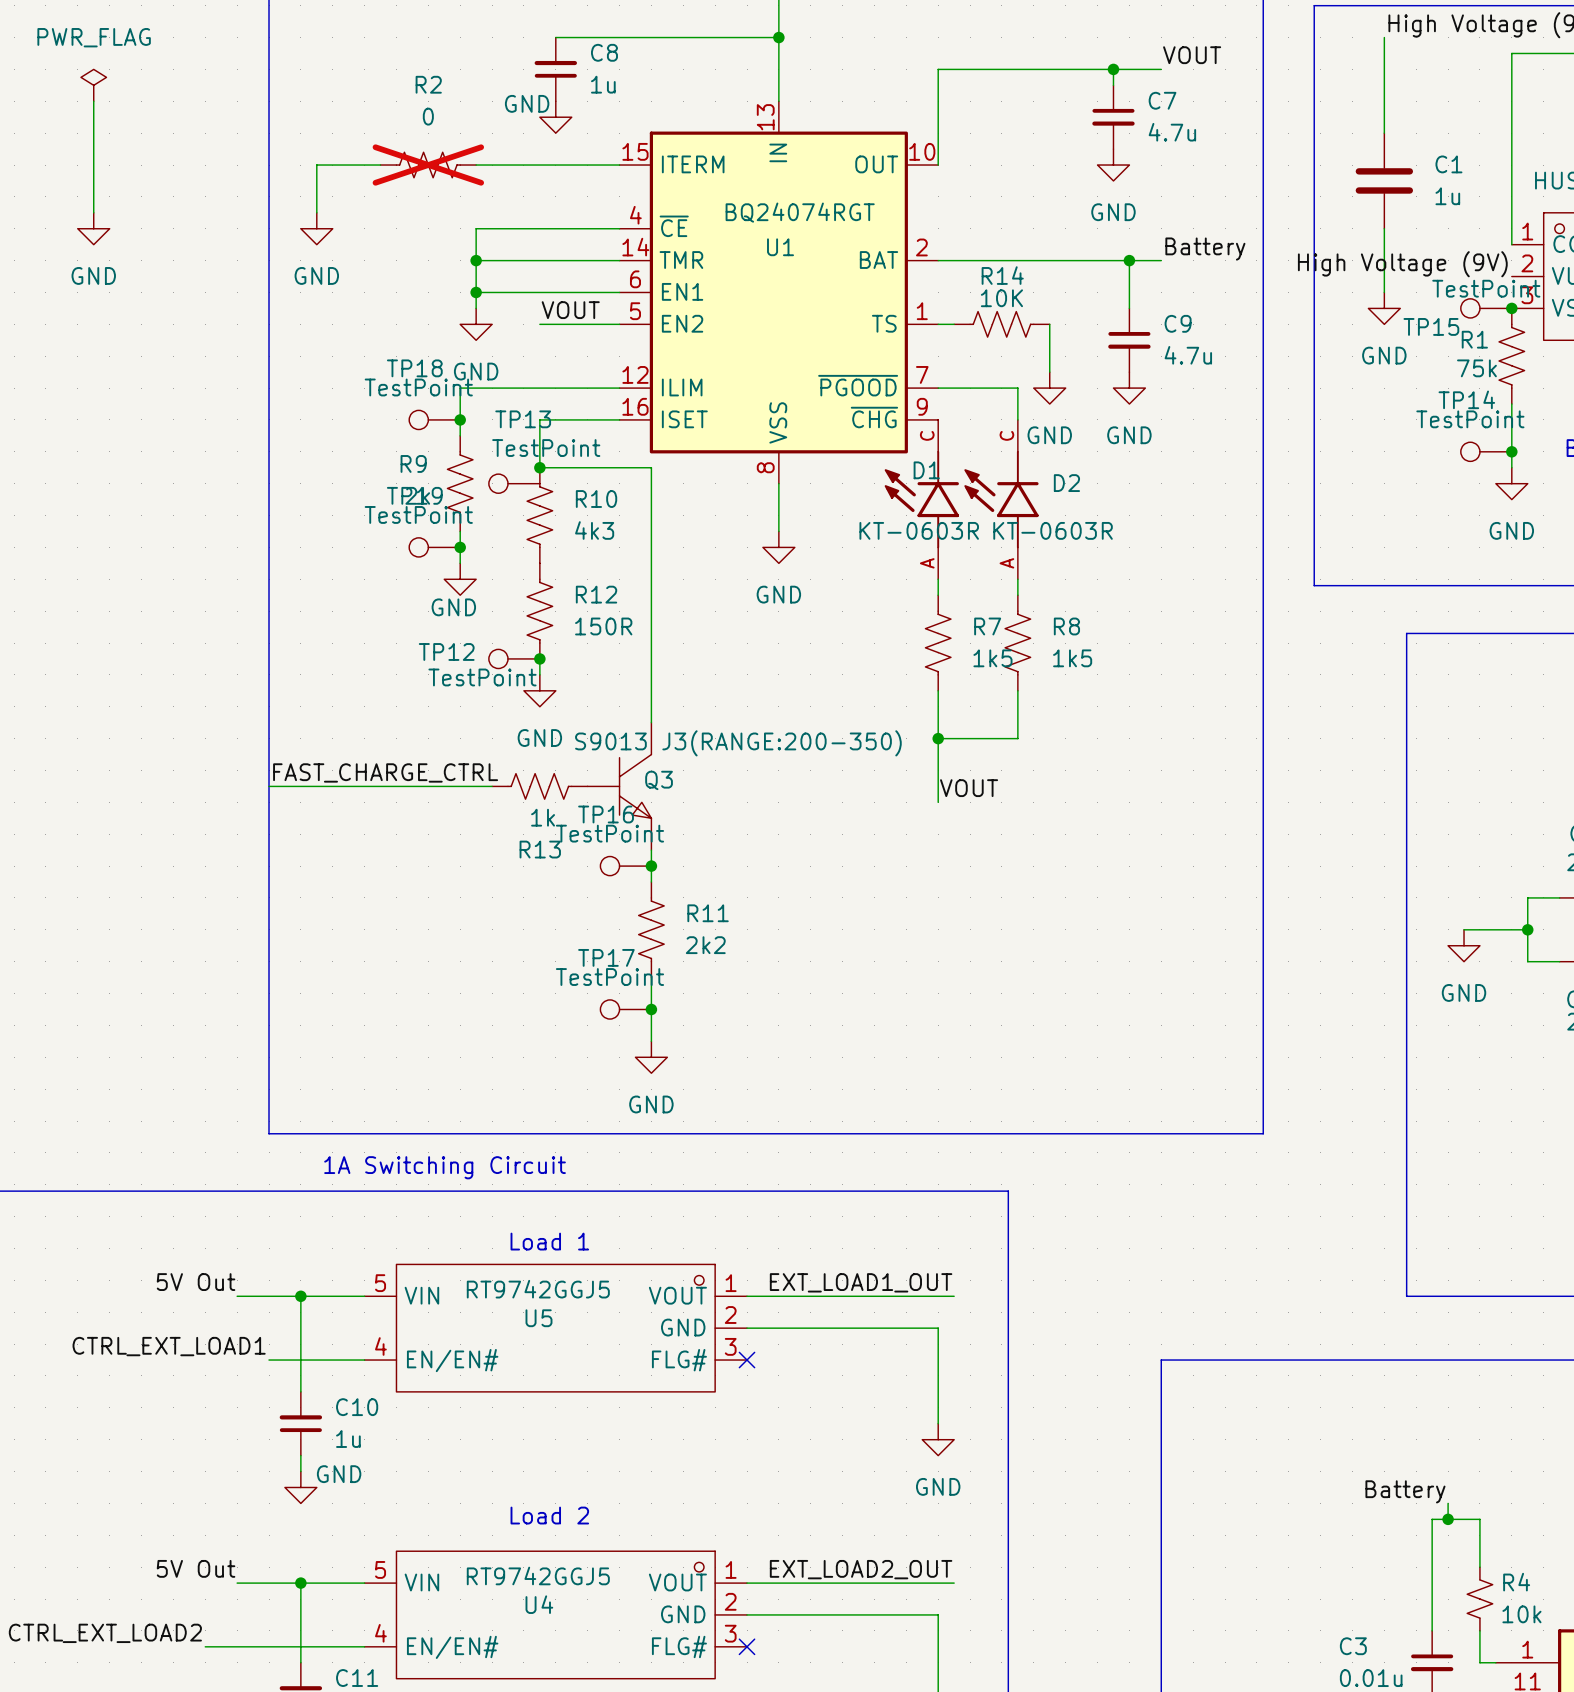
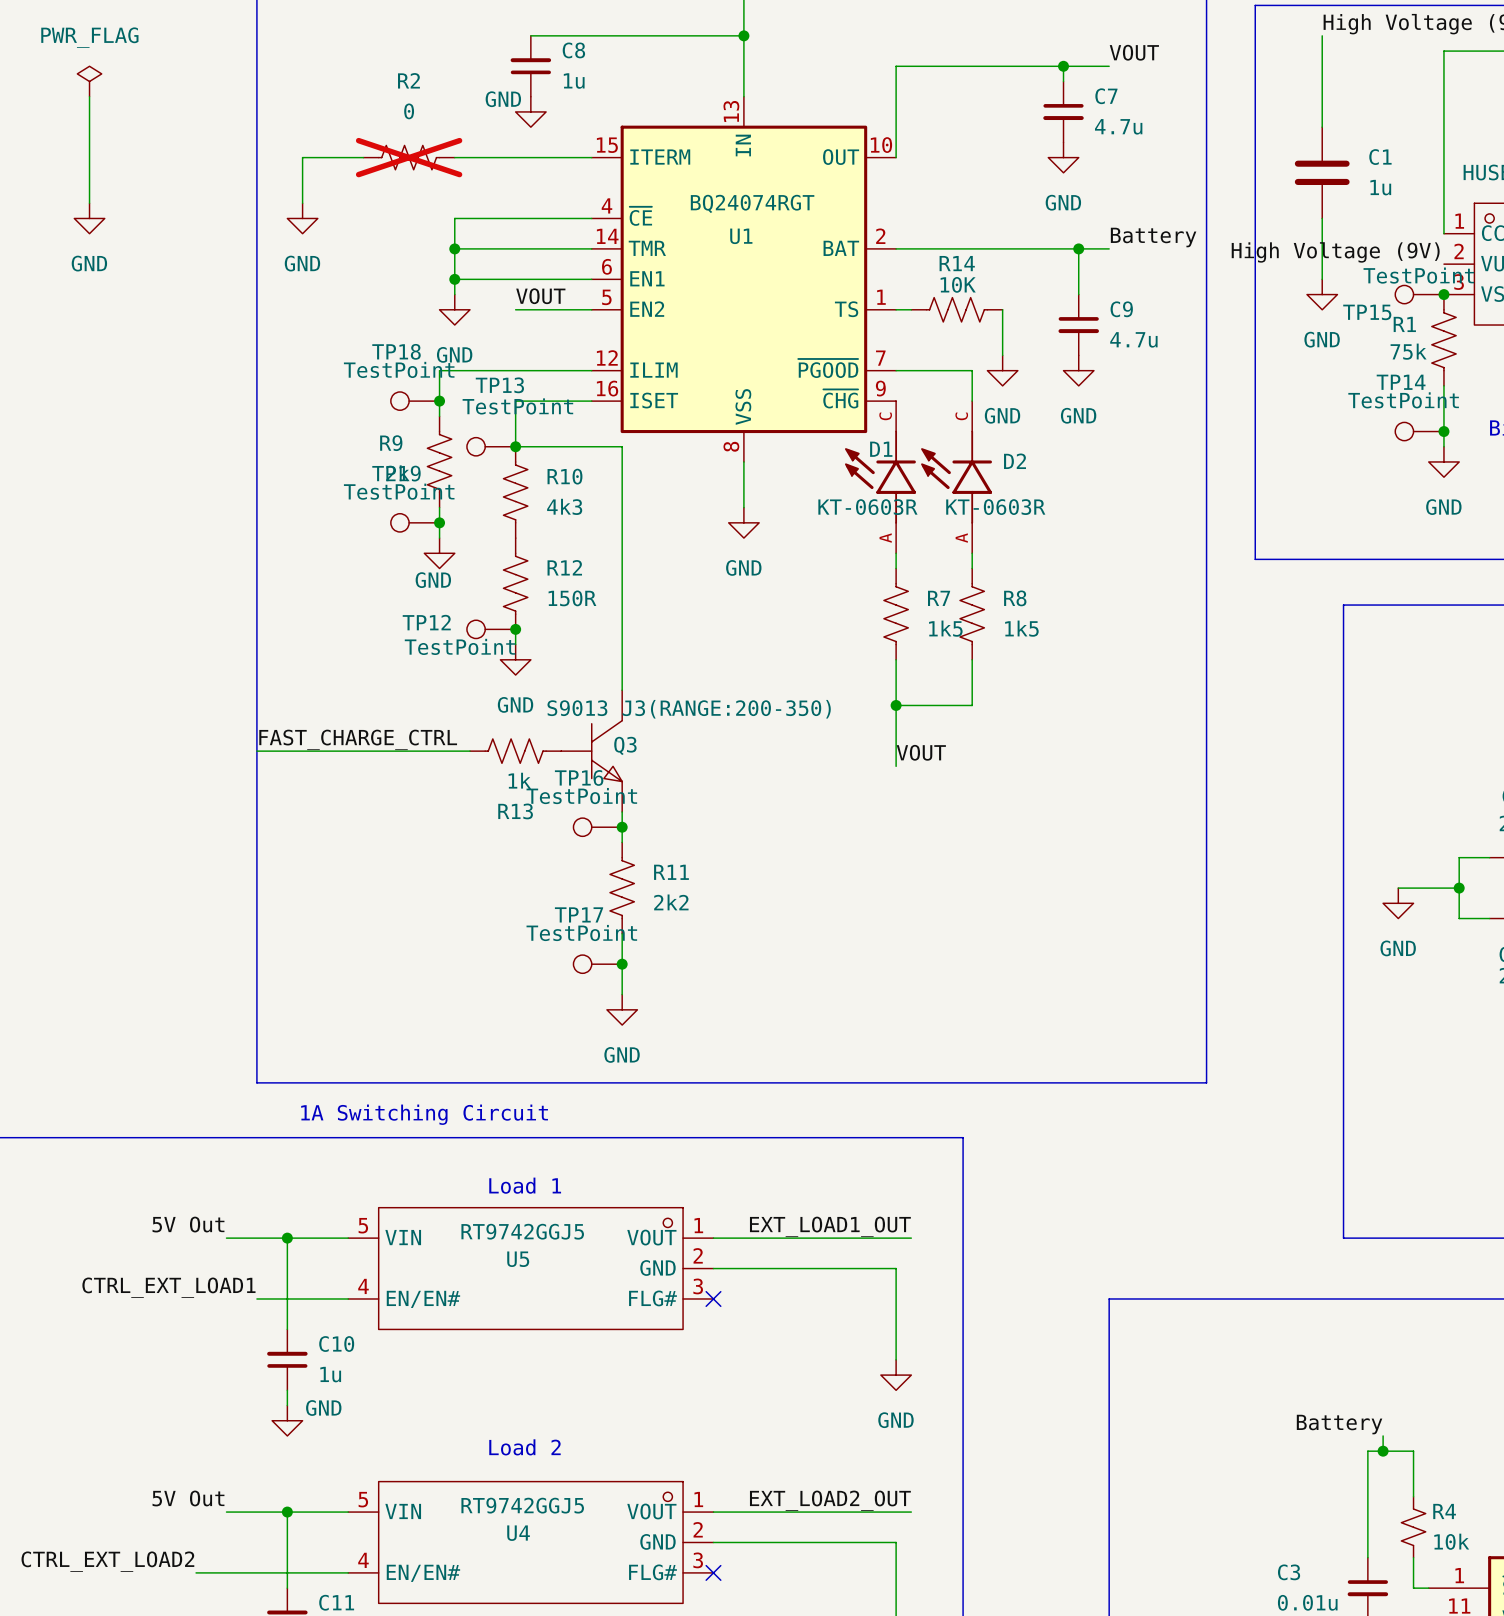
TP13 value position: TestPoint (546, 448) -> TestPoint (517, 406)
TP13 position: (514, 483) -> (491, 446)

